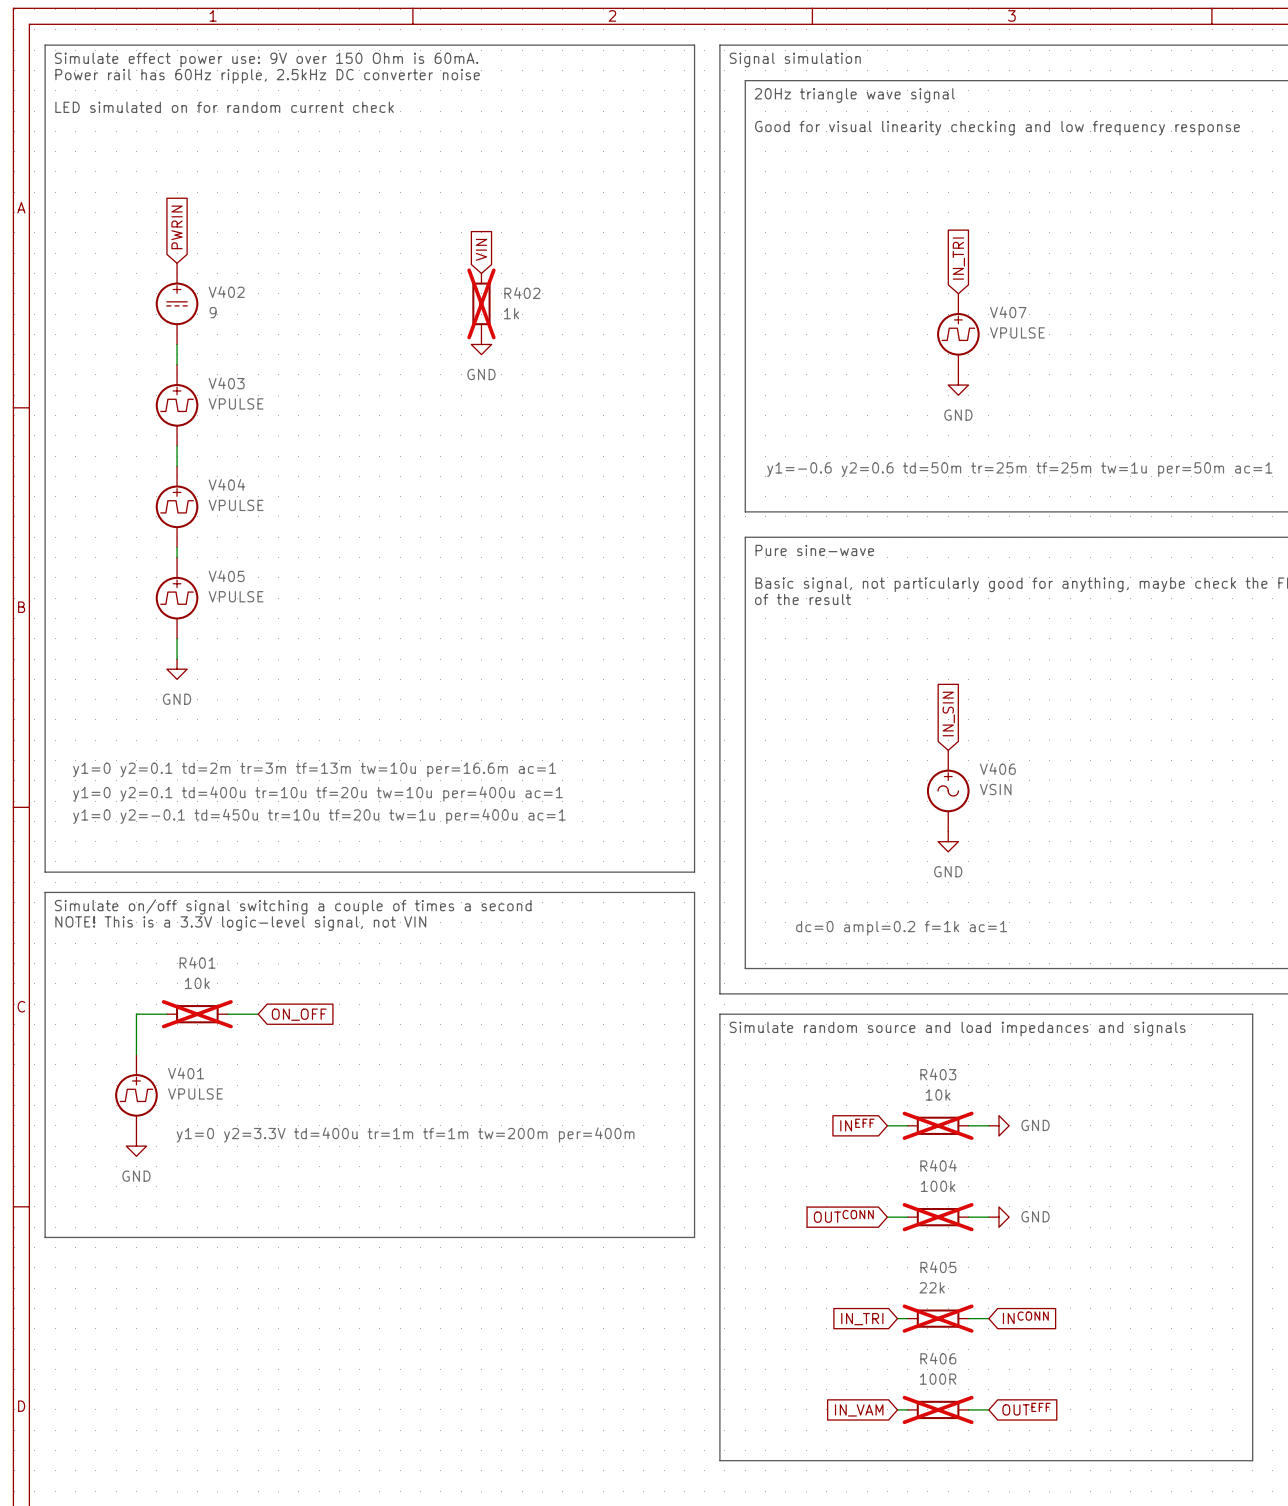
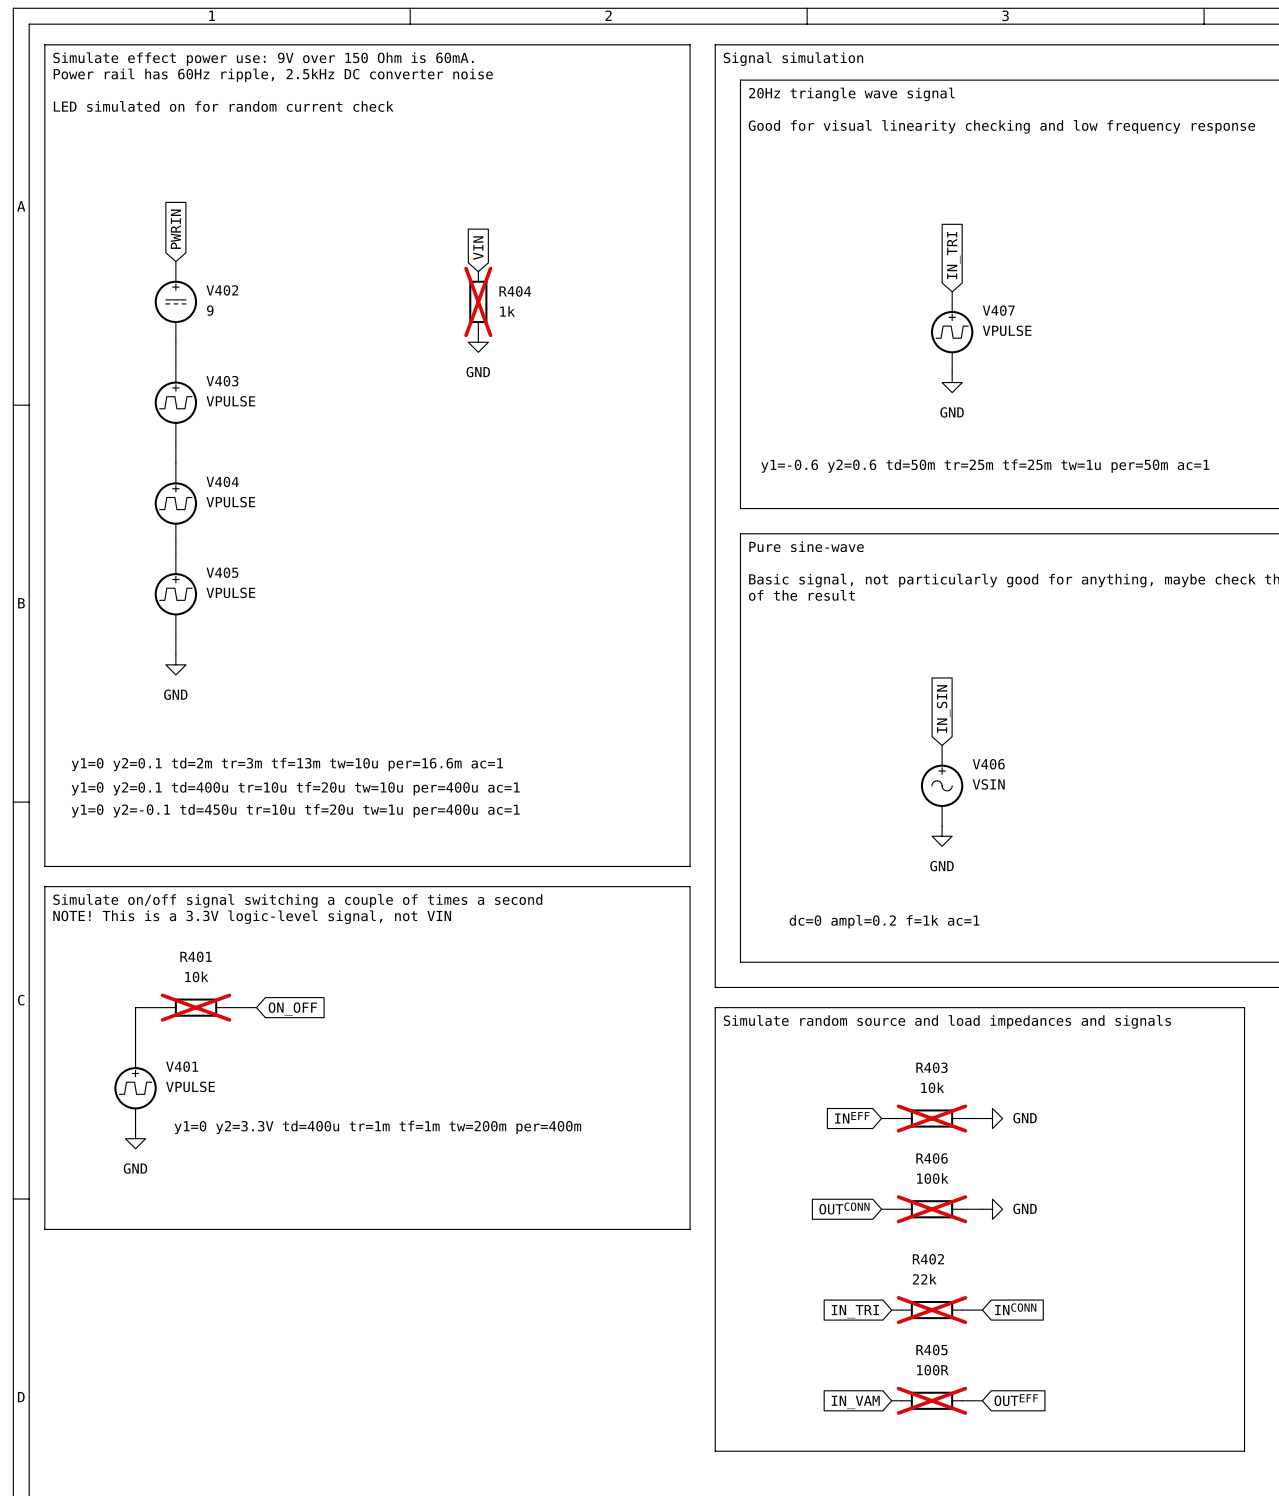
R402 name: R402 (522, 293) -> R404 (515, 291)
R404 name: R404 (938, 1165) -> R406 (932, 1158)
R405 name: R405 (938, 1267) -> R402 (928, 1259)
R406 name: R406 (938, 1358) -> R405 (931, 1350)

